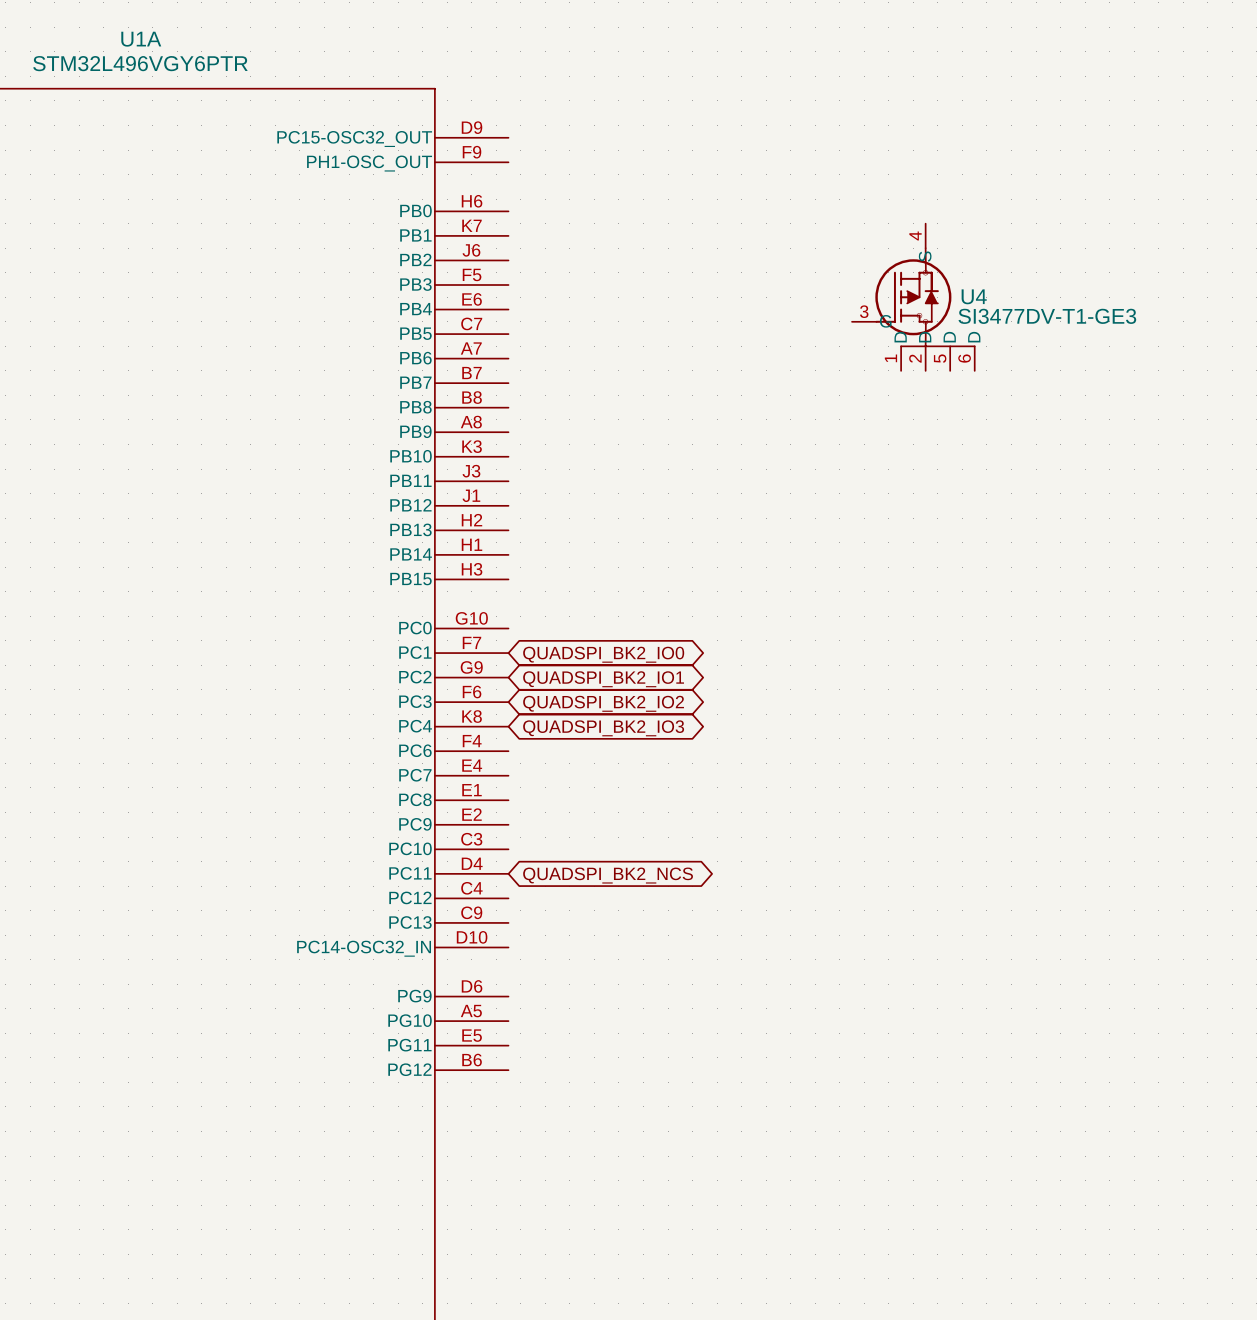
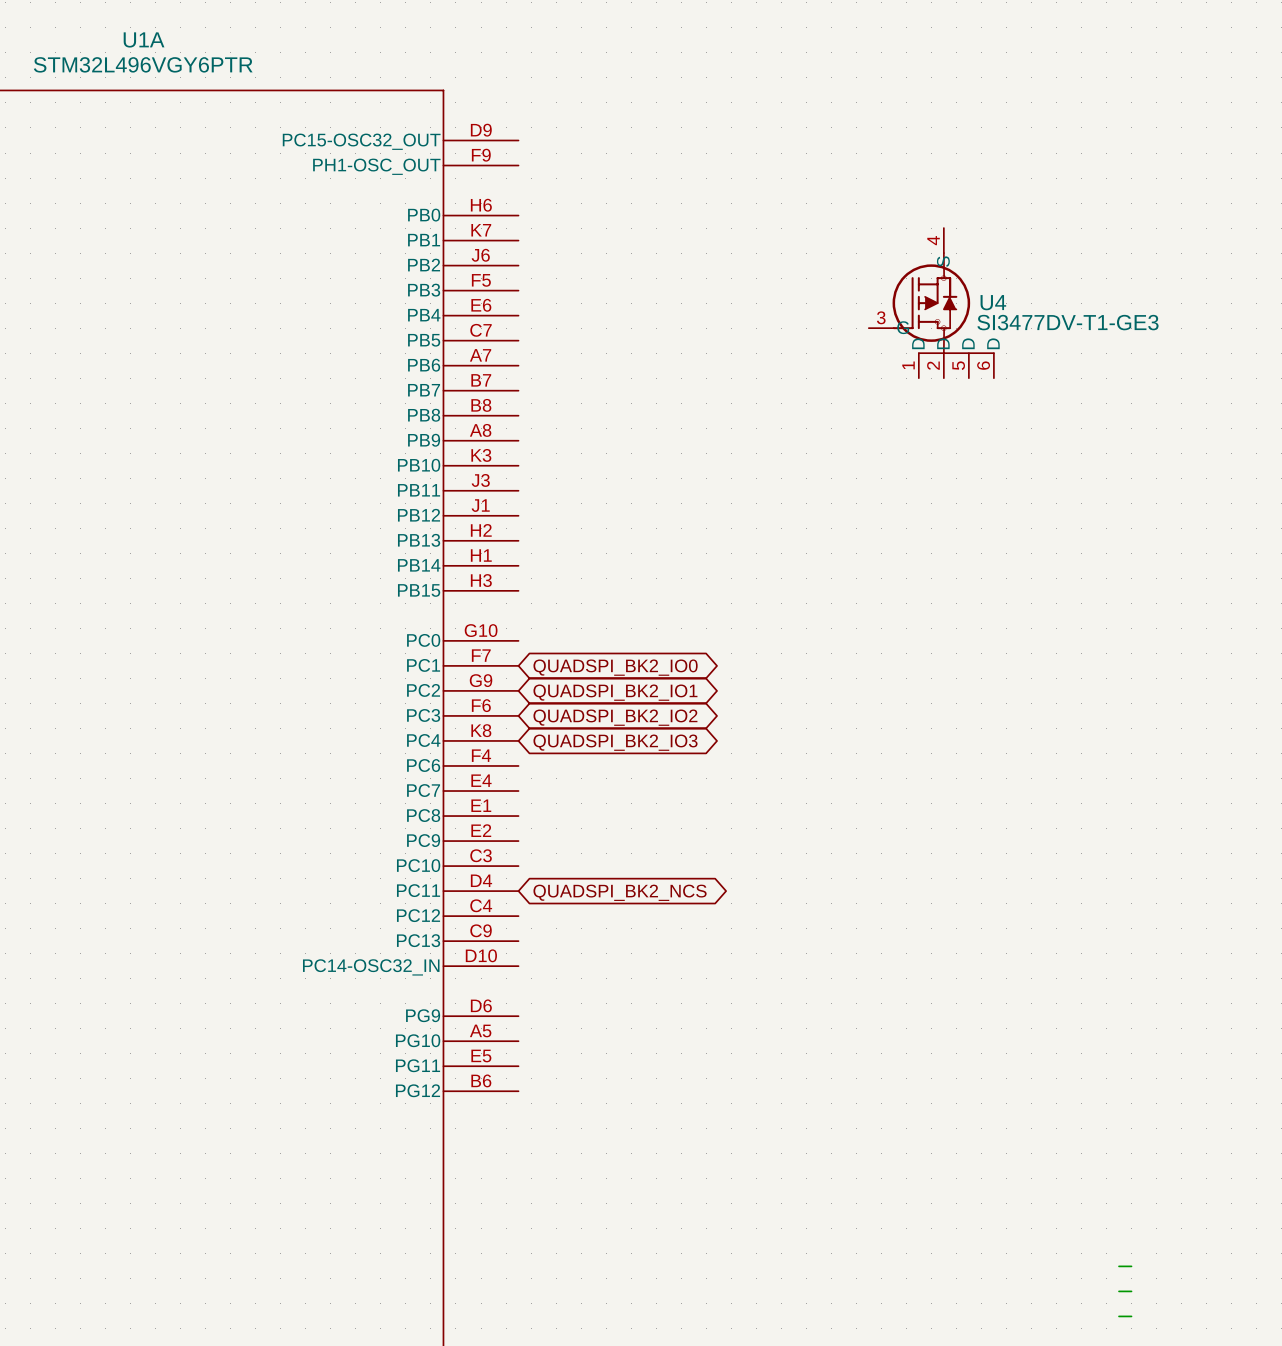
wire: none -> (1119, 1266) (1131, 1266)
wire: none -> (1119, 1291) (1131, 1291)
wire: none -> (1119, 1316) (1131, 1316)

